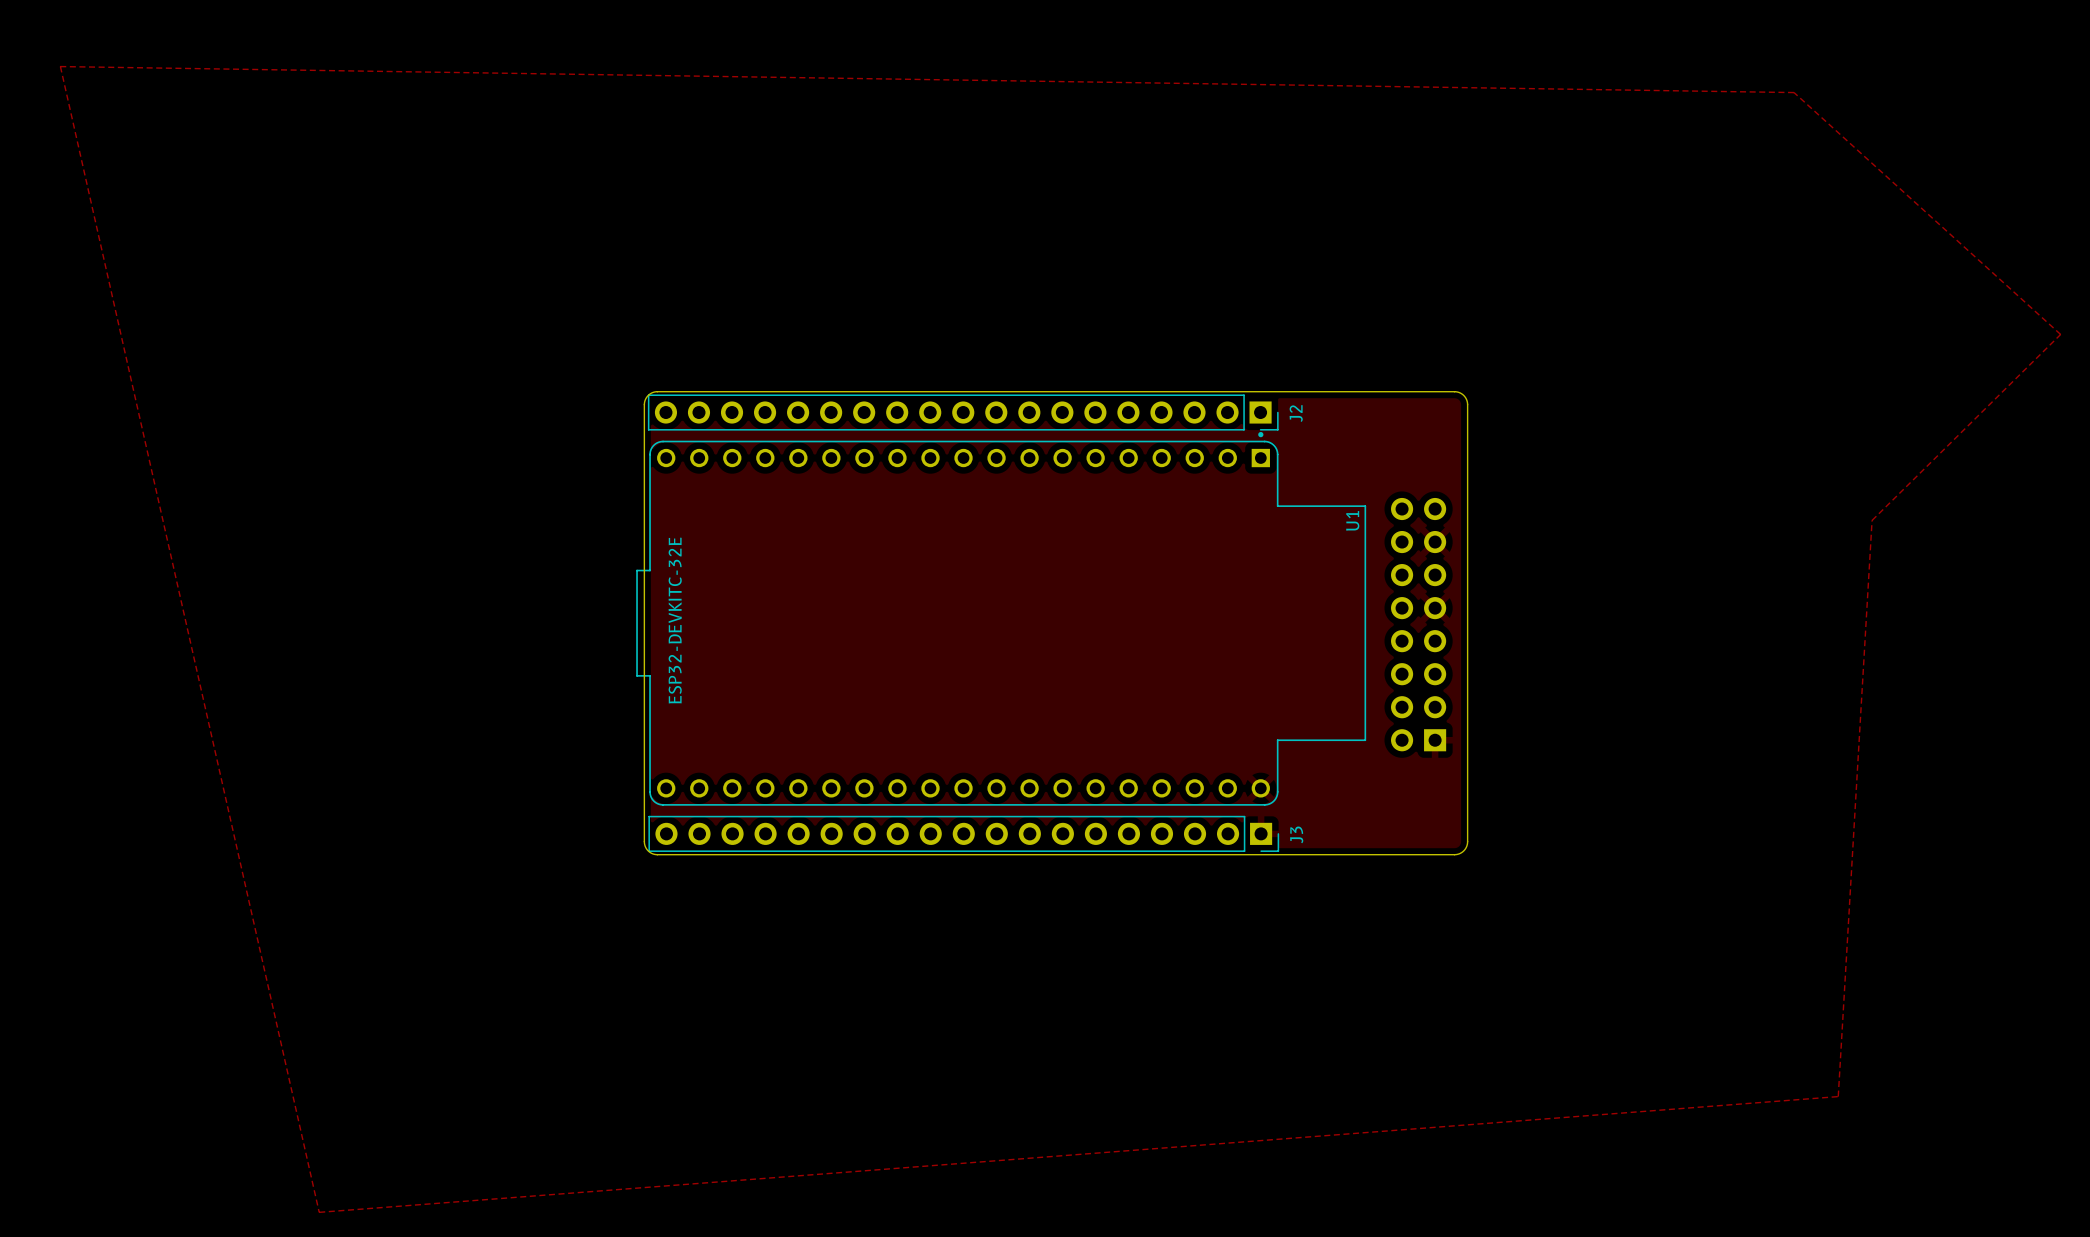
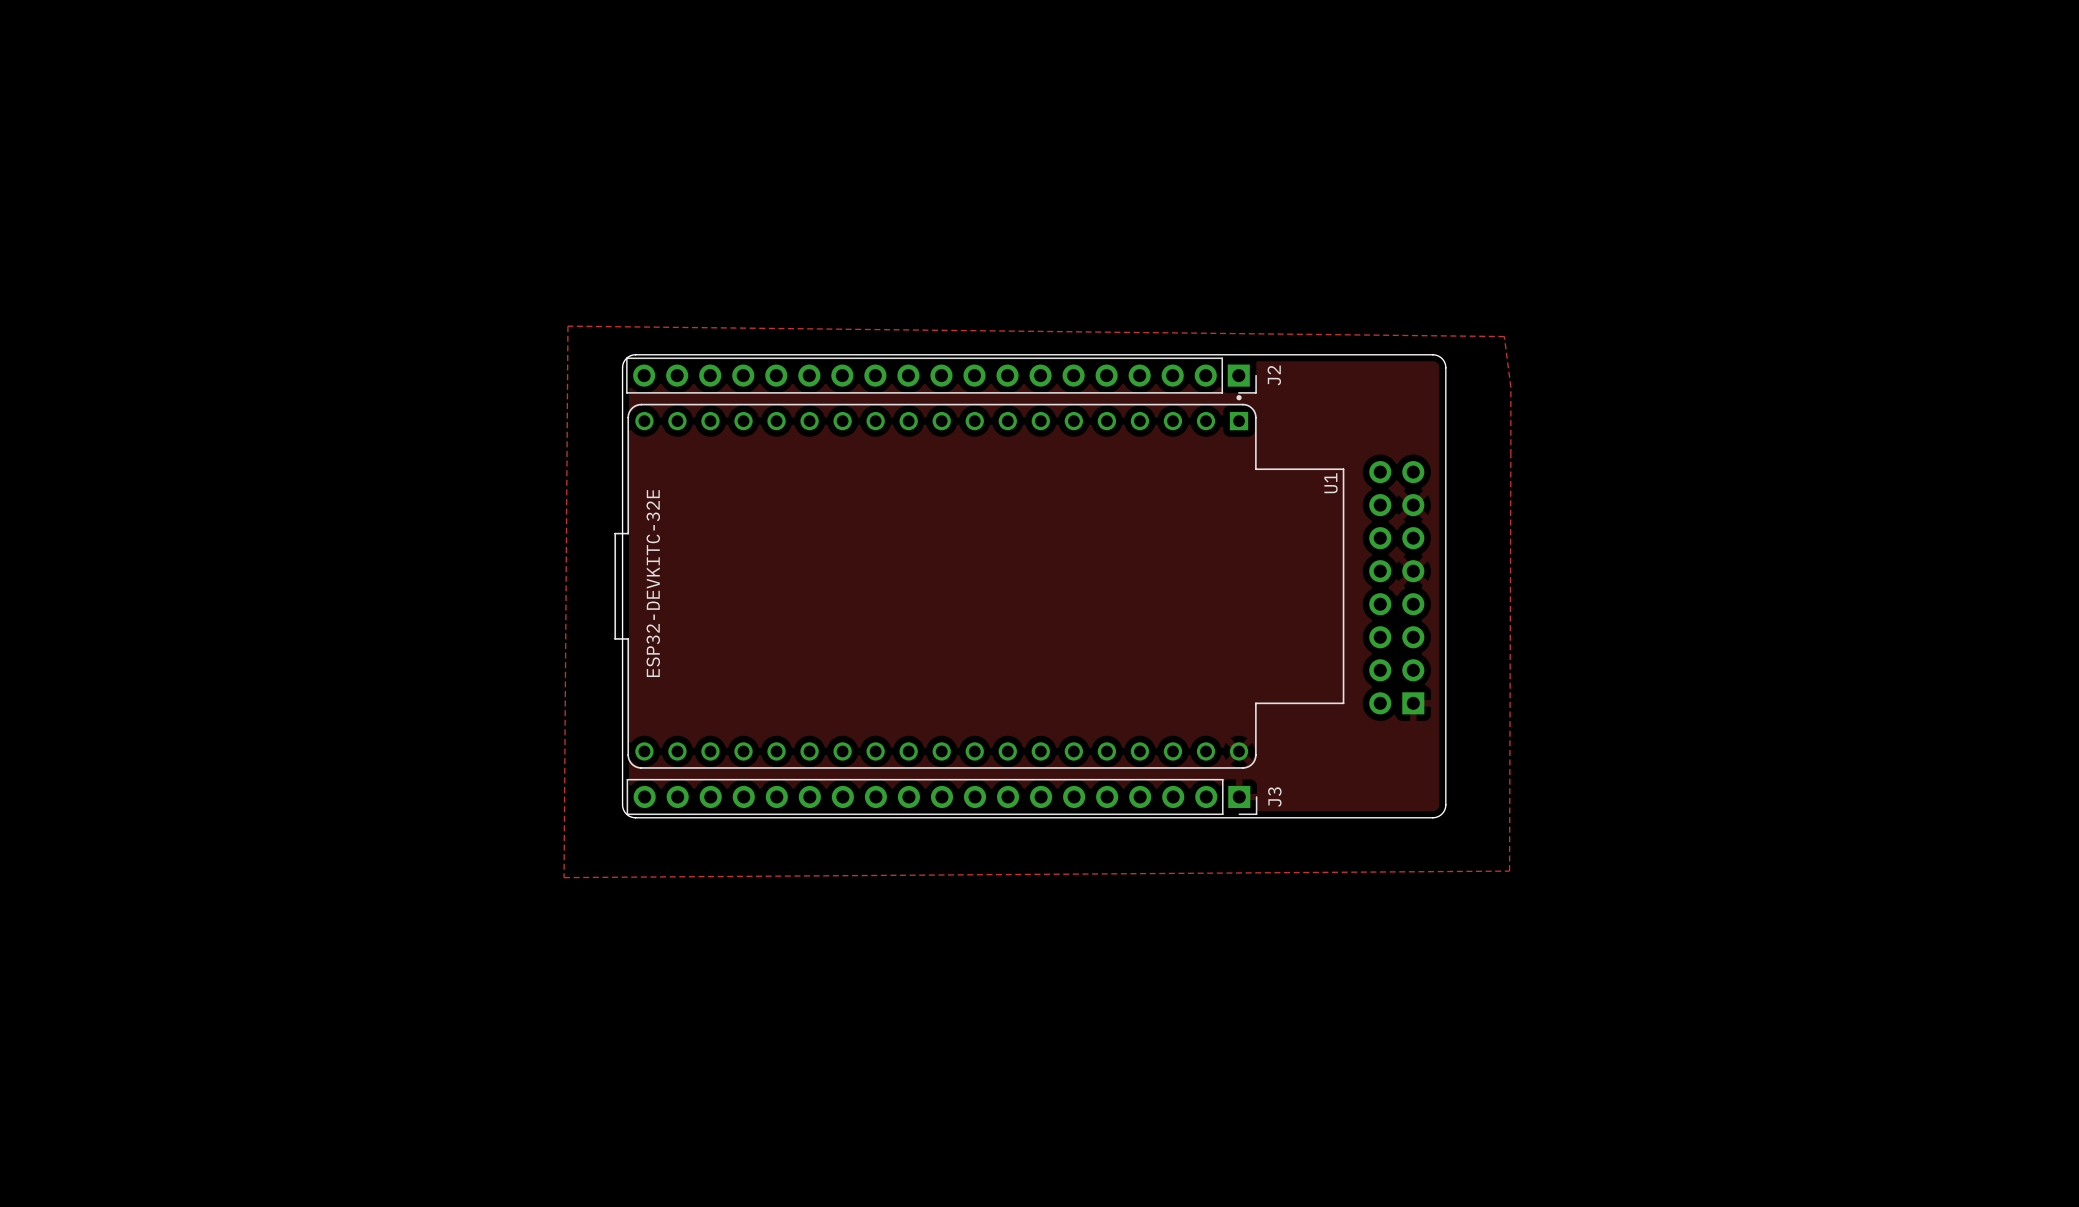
zone outline: (60, 66) (1794, 92) (2060, 334) (1872, 520) (1838, 1096) (319, 1212) (60, 66) -> none
zone outline: none -> (567, 326) (1504, 336) (1510, 387) (1509, 871) (564, 877) (567, 326)

